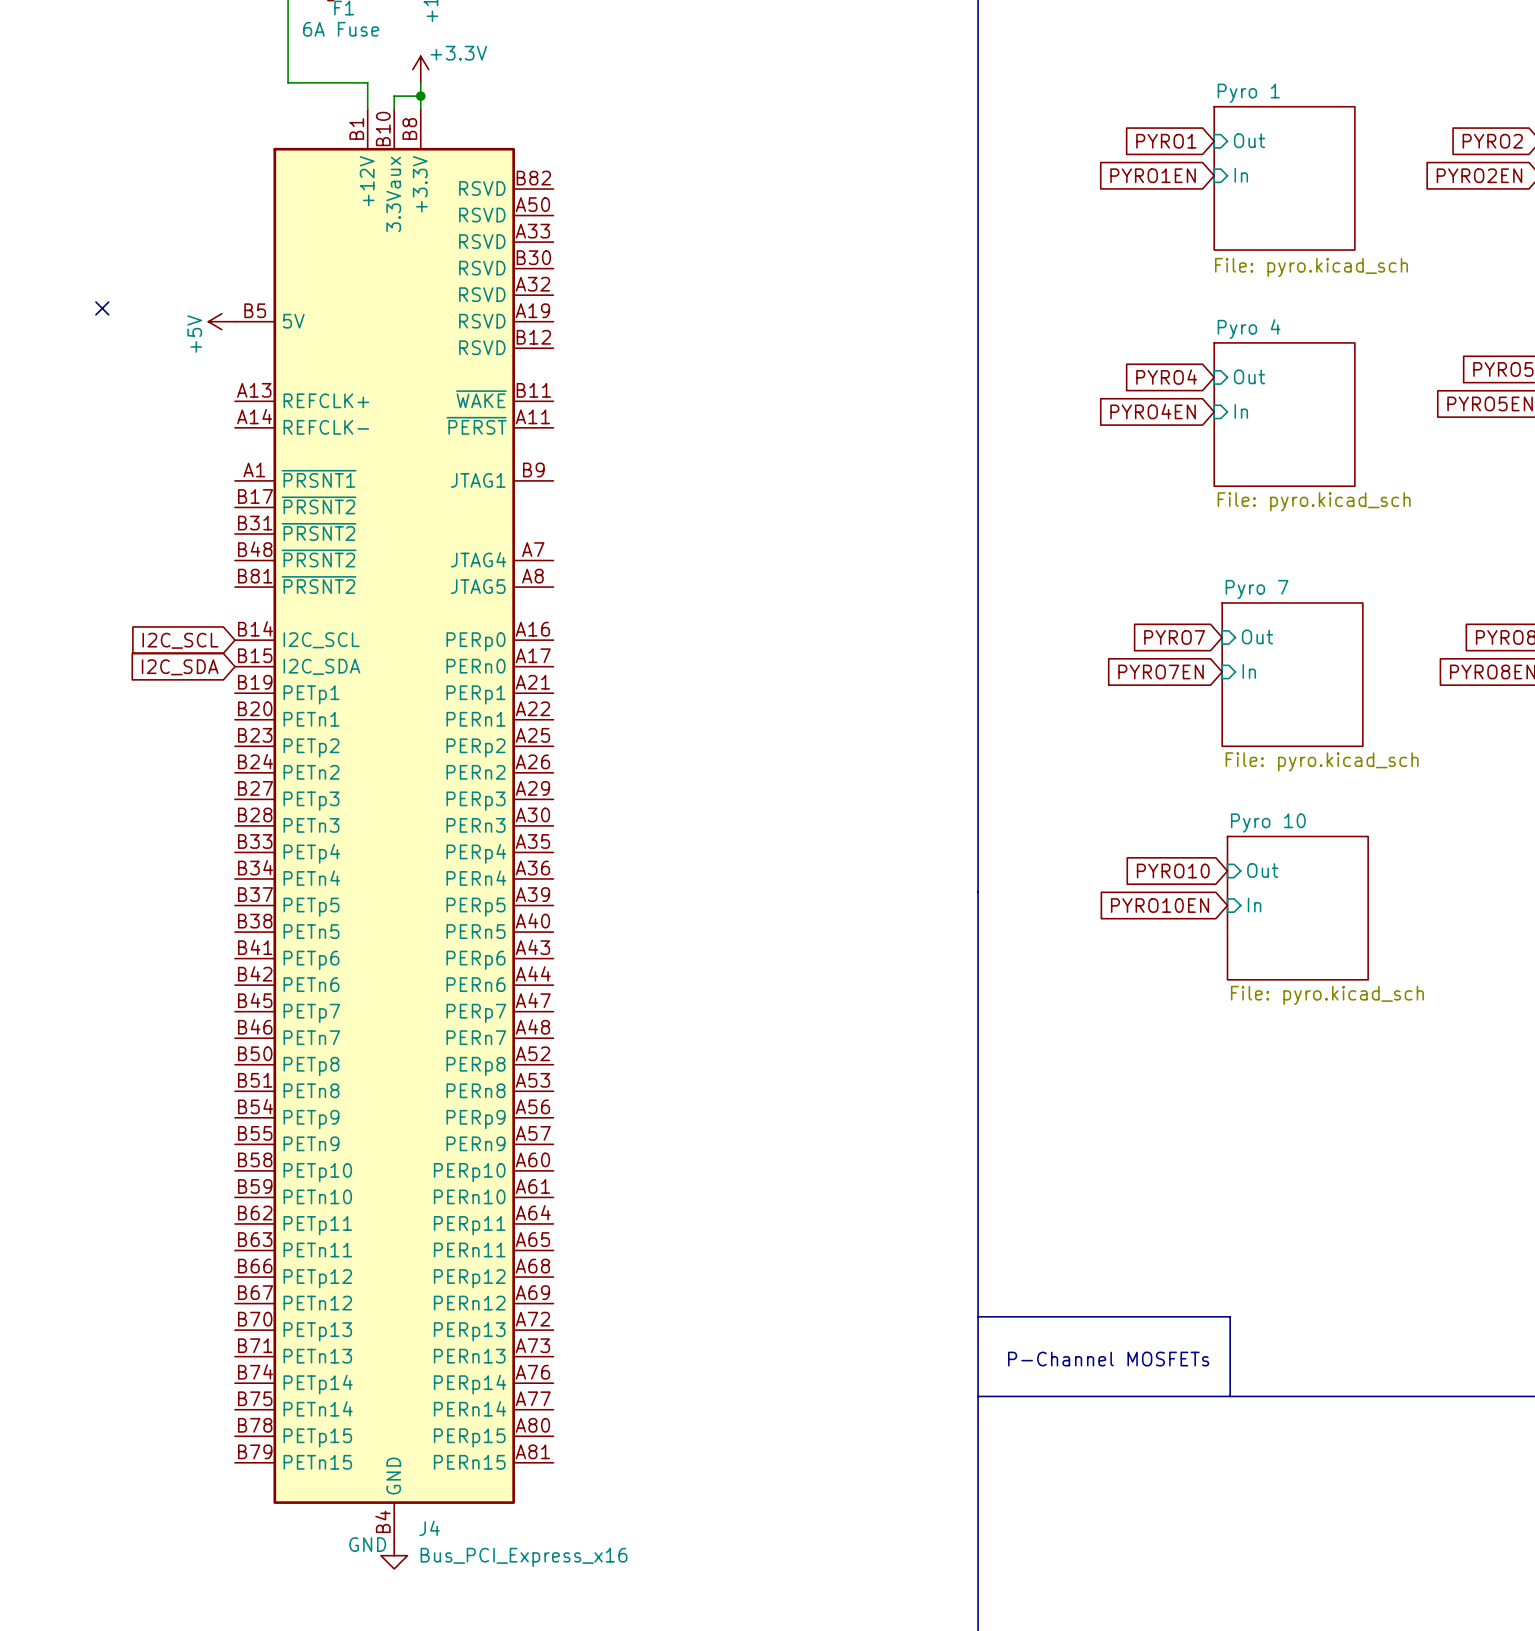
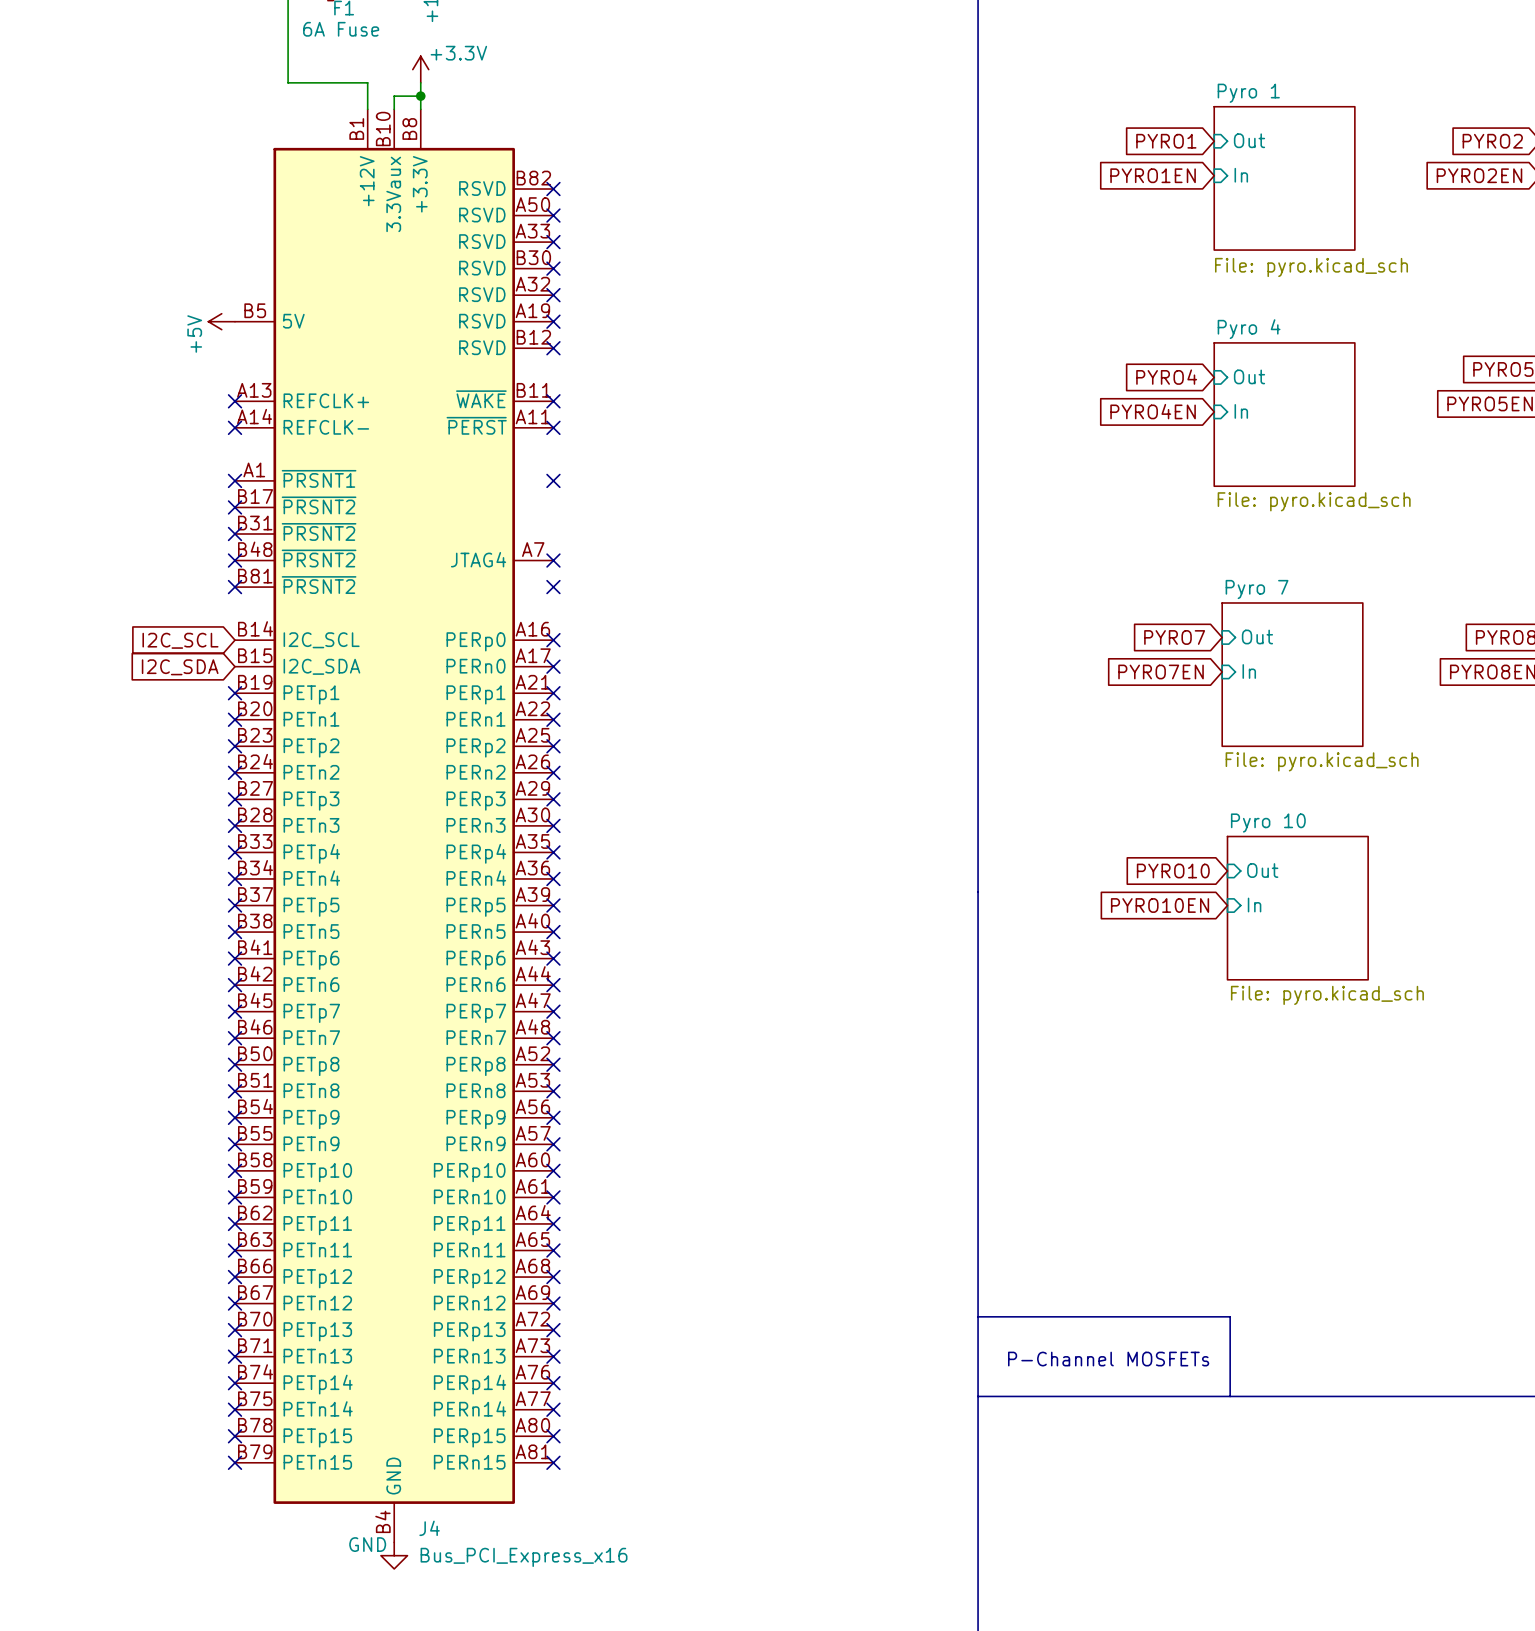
J4 symbol: [235, 109, 554, 1543] -> [235, 109, 554, 1543]
no-connect mark: none -> (553, 189)
no-connect mark: none -> (553, 215)
no-connect mark: none -> (553, 242)
no-connect mark: none -> (553, 268)
no-connect mark: none -> (553, 295)
no-connect mark: (102, 308) -> none
no-connect mark: none -> (553, 321)
no-connect mark: none -> (553, 348)
no-connect mark: none -> (235, 401)
no-connect mark: none -> (553, 401)
no-connect mark: none -> (235, 427)
no-connect mark: none -> (553, 427)
no-connect mark: none -> (235, 480)
no-connect mark: none -> (553, 480)
no-connect mark: none -> (235, 507)
no-connect mark: none -> (235, 533)
no-connect mark: none -> (235, 560)
no-connect mark: none -> (553, 560)
no-connect mark: none -> (235, 587)
no-connect mark: none -> (553, 587)
no-connect mark: none -> (553, 640)
no-connect mark: none -> (553, 666)
no-connect mark: none -> (235, 693)
no-connect mark: none -> (553, 693)
no-connect mark: none -> (235, 719)
no-connect mark: none -> (553, 719)
no-connect mark: none -> (235, 746)
no-connect mark: none -> (553, 746)
no-connect mark: none -> (235, 772)
no-connect mark: none -> (553, 772)
no-connect mark: none -> (235, 799)
no-connect mark: none -> (553, 799)
no-connect mark: none -> (235, 825)
no-connect mark: none -> (553, 825)
no-connect mark: none -> (235, 852)
no-connect mark: none -> (553, 852)
no-connect mark: none -> (235, 878)
no-connect mark: none -> (553, 878)
no-connect mark: none -> (235, 905)
no-connect mark: none -> (553, 905)
no-connect mark: none -> (235, 932)
no-connect mark: none -> (553, 932)
no-connect mark: none -> (235, 958)
no-connect mark: none -> (553, 958)
no-connect mark: none -> (235, 985)
no-connect mark: none -> (553, 985)
no-connect mark: none -> (235, 1011)
no-connect mark: none -> (553, 1011)
no-connect mark: none -> (235, 1038)
no-connect mark: none -> (553, 1038)
no-connect mark: none -> (235, 1064)
no-connect mark: none -> (553, 1064)
no-connect mark: none -> (235, 1091)
no-connect mark: none -> (553, 1091)
no-connect mark: none -> (235, 1117)
no-connect mark: none -> (553, 1117)
no-connect mark: none -> (235, 1144)
no-connect mark: none -> (553, 1144)
no-connect mark: none -> (235, 1170)
no-connect mark: none -> (553, 1170)
no-connect mark: none -> (235, 1197)
no-connect mark: none -> (553, 1197)
no-connect mark: none -> (235, 1223)
no-connect mark: none -> (553, 1223)
no-connect mark: none -> (235, 1250)
no-connect mark: none -> (553, 1250)
no-connect mark: none -> (235, 1277)
no-connect mark: none -> (553, 1277)
no-connect mark: none -> (235, 1303)
no-connect mark: none -> (553, 1303)
no-connect mark: none -> (235, 1330)
no-connect mark: none -> (553, 1330)
no-connect mark: none -> (235, 1356)
no-connect mark: none -> (553, 1356)
no-connect mark: none -> (235, 1383)
no-connect mark: none -> (553, 1383)
no-connect mark: none -> (235, 1409)
no-connect mark: none -> (553, 1409)
no-connect mark: none -> (235, 1436)
no-connect mark: none -> (553, 1436)
no-connect mark: none -> (235, 1462)
no-connect mark: none -> (553, 1462)

